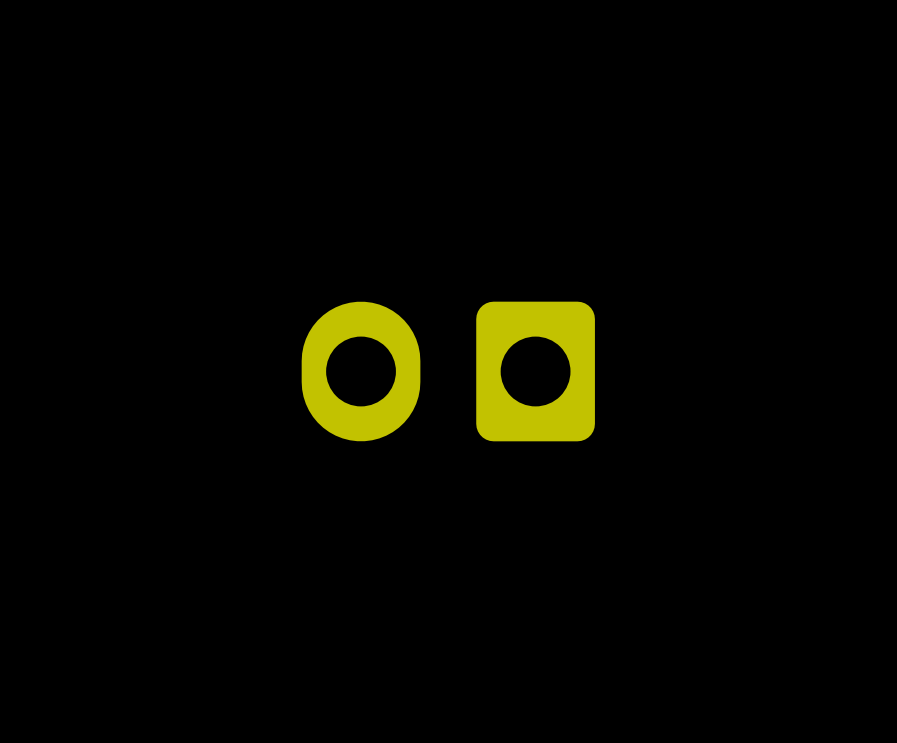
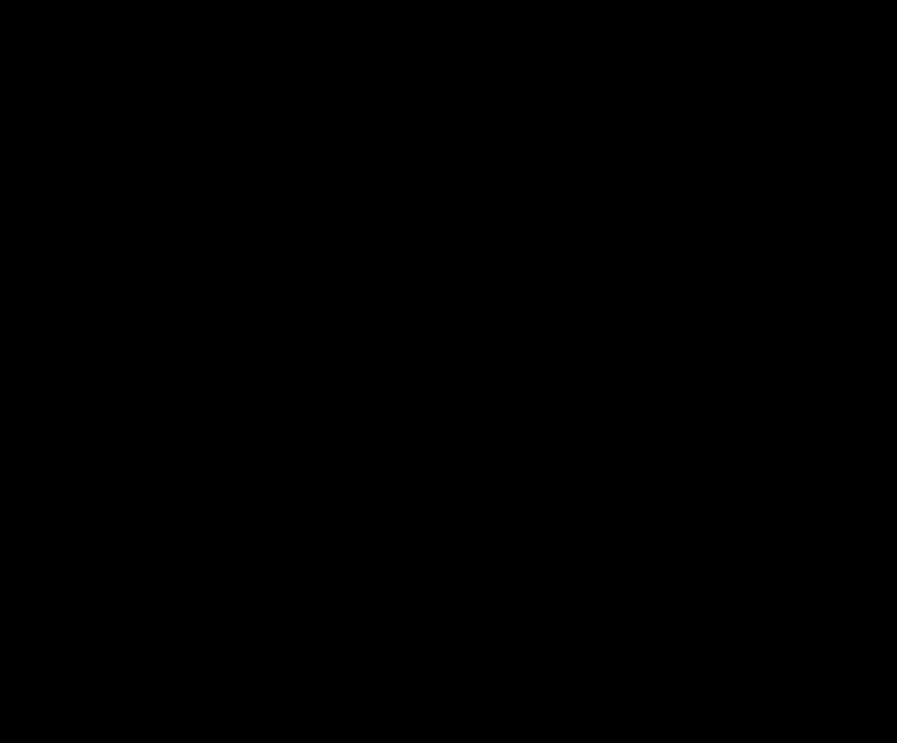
part: (448, 371) -> none

